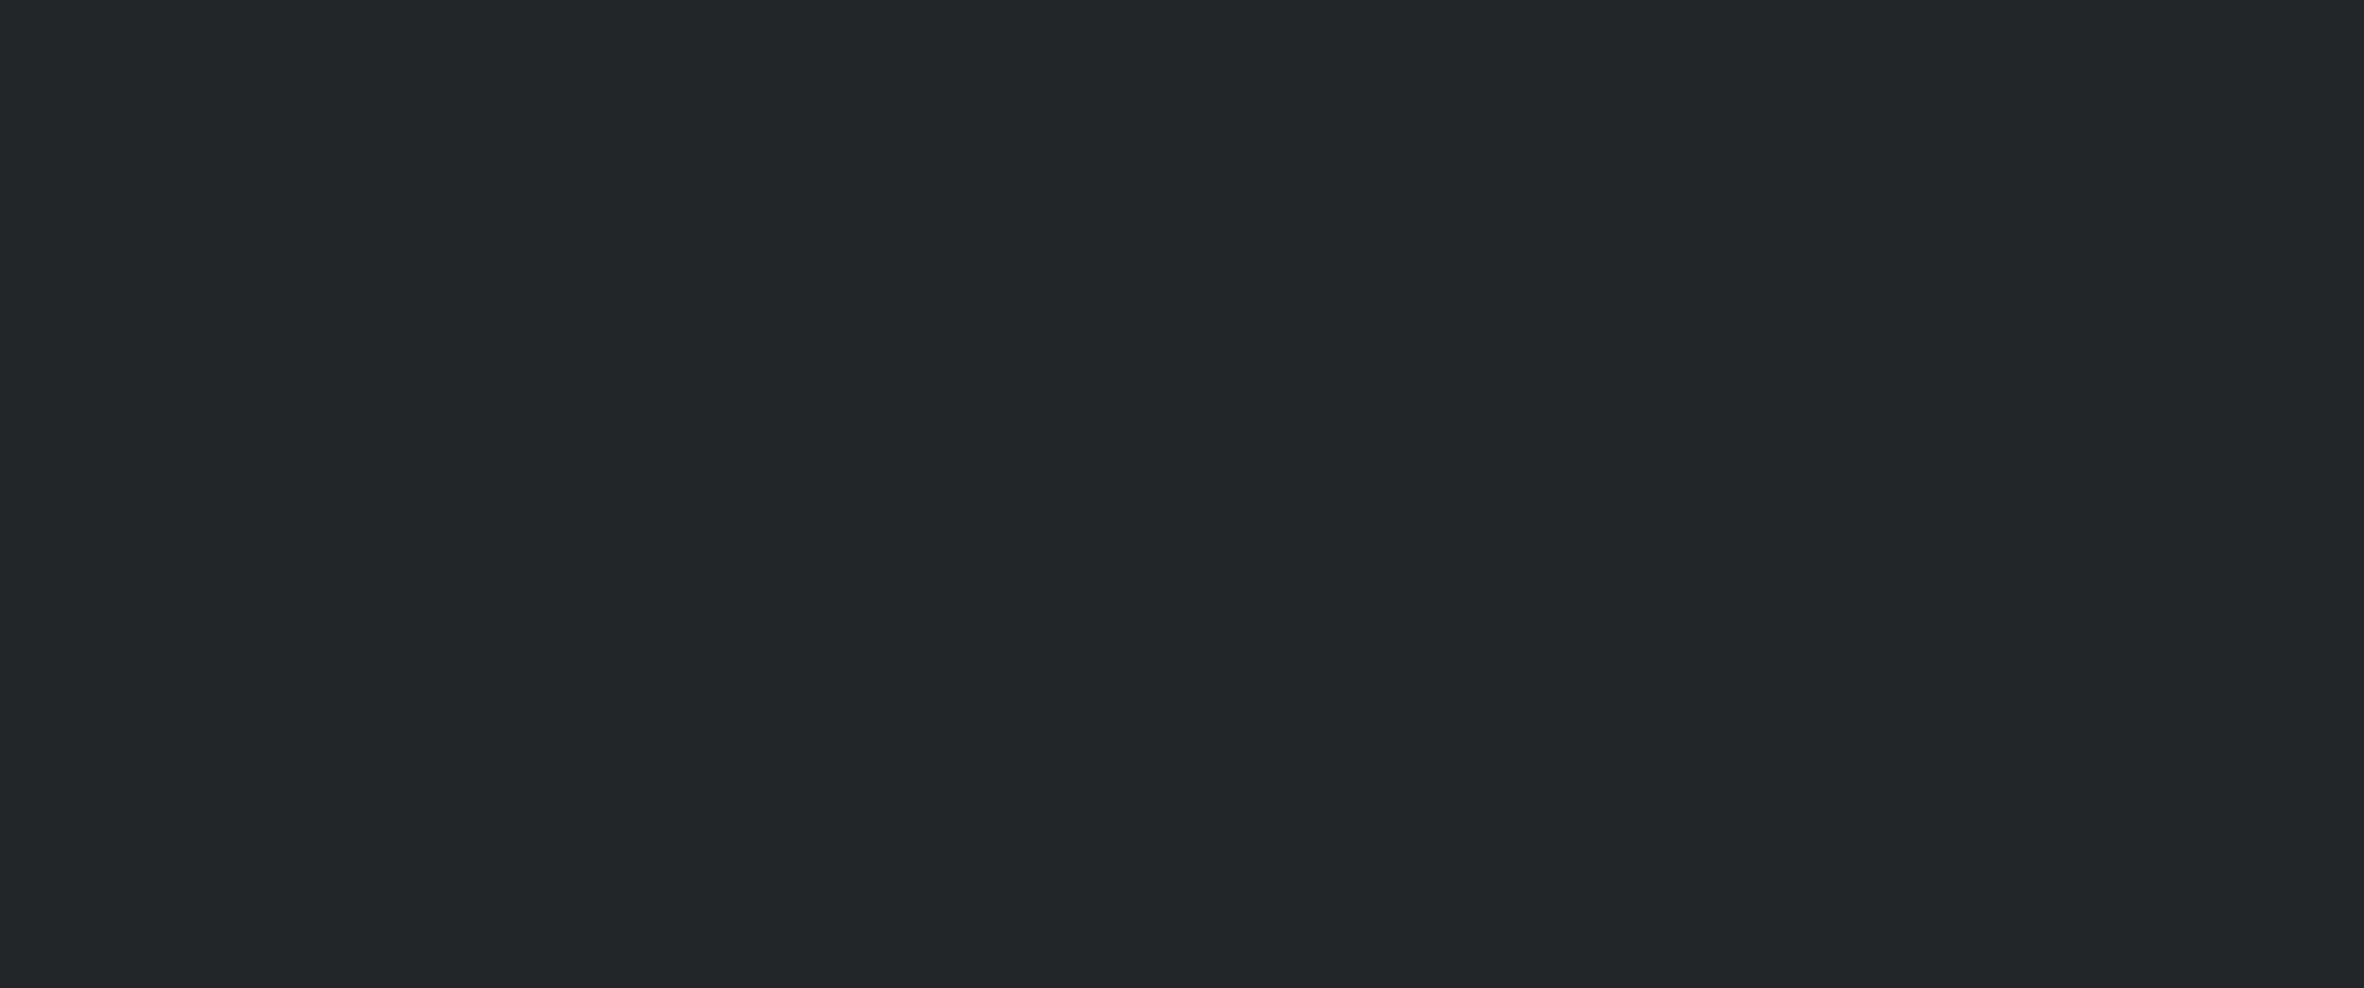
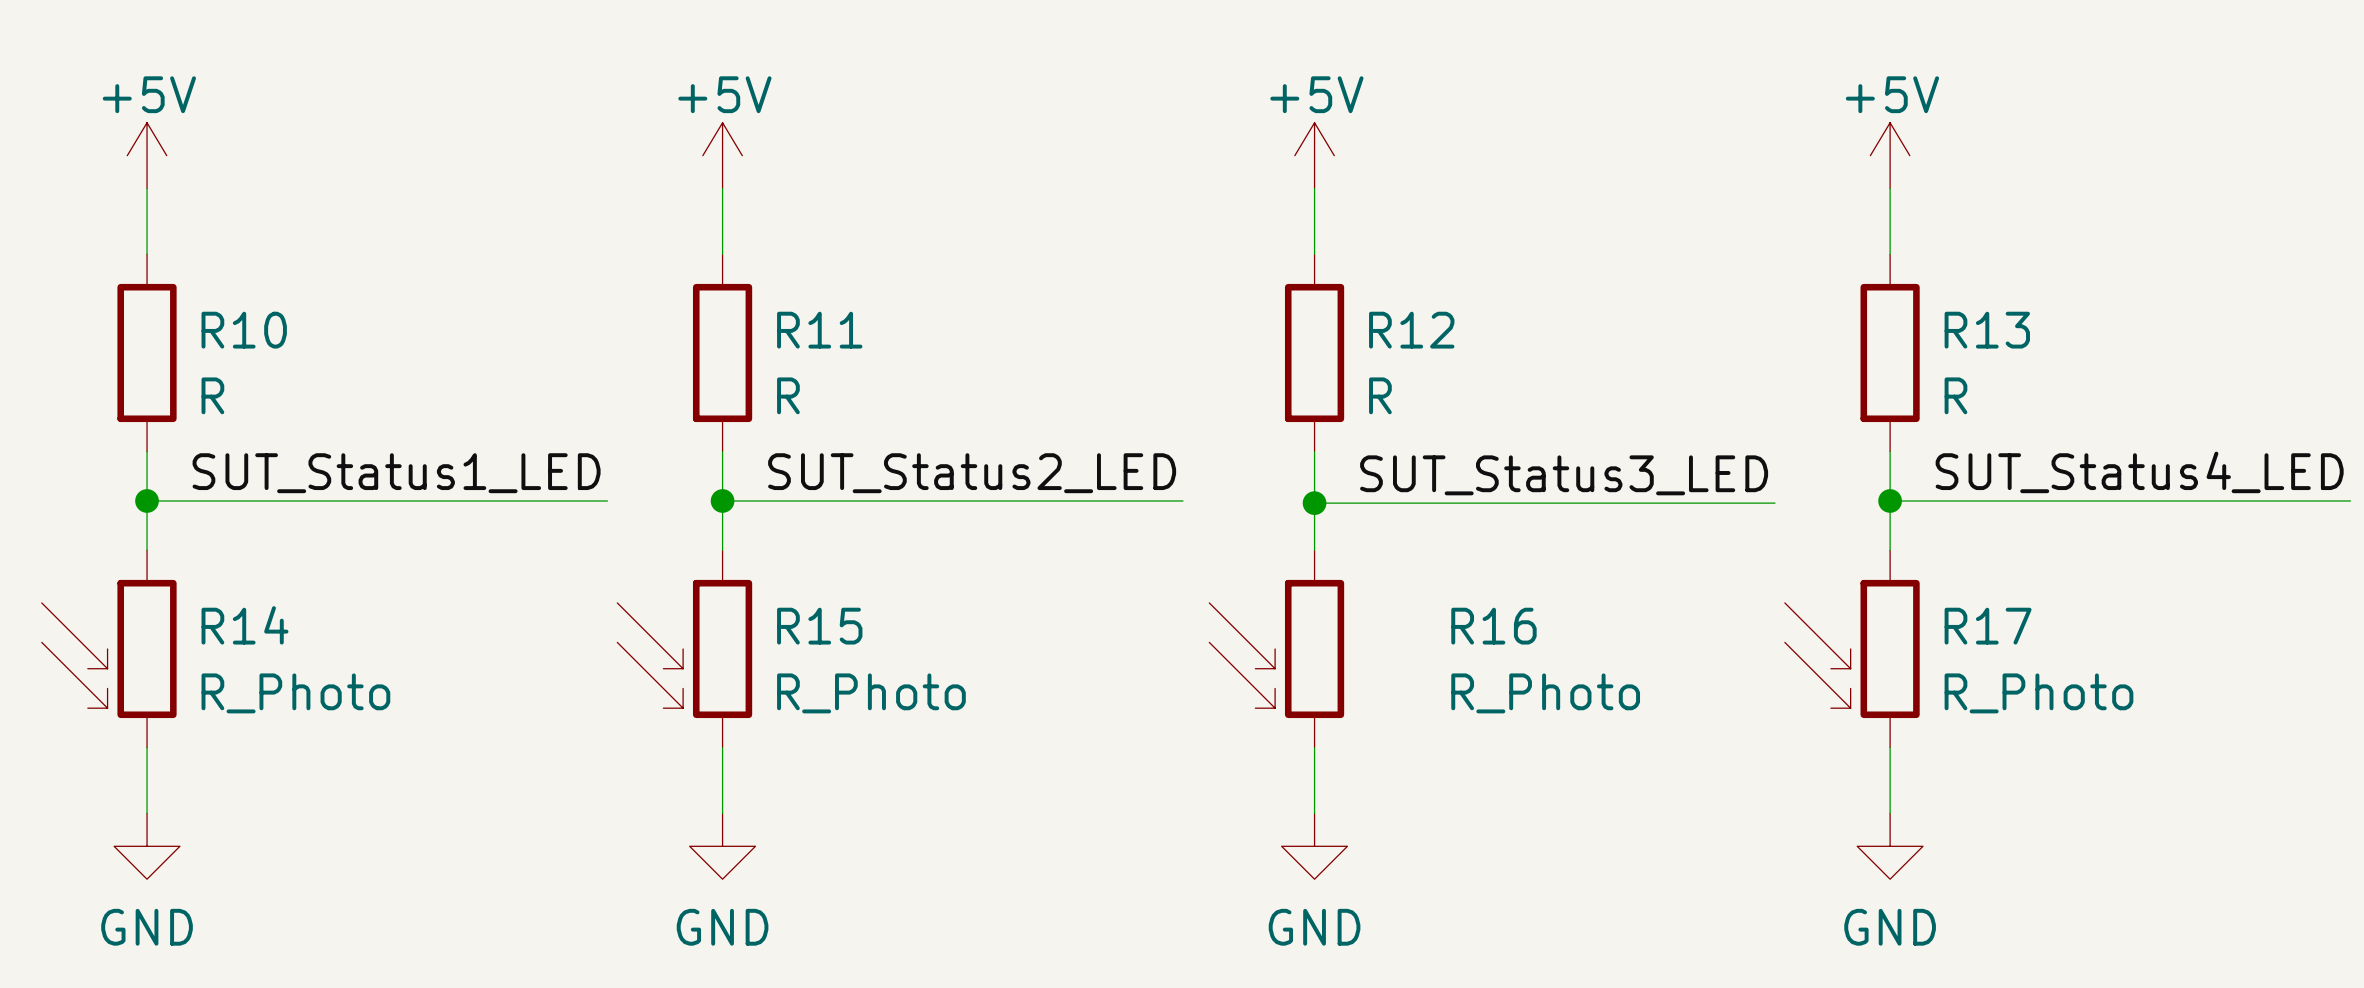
power symbol: none -> +5V (147, 155)
power symbol: none -> +5V (722, 155)
power symbol: none -> +5V (1314, 155)
power symbol: none -> +5V (1890, 155)
wire: none -> (147, 188) (147, 254)
wire: none -> (722, 188) (722, 254)
wire: none -> (1314, 188) (1314, 254)
wire: none -> (1890, 188) (1890, 254)
R10: none -> R (147, 352)
R11: none -> R (722, 352)
R12: none -> R (1314, 352)
R13: none -> R (1890, 352)
wire: none -> (147, 451) (147, 550)
wire: none -> (722, 451) (722, 550)
wire: none -> (1314, 451) (1314, 550)
wire: none -> (1890, 451) (1890, 550)
label: none -> SUT_Status1_LED (396, 473)
label: none -> SUT_Status2_LED (972, 473)
label: none -> SUT_Status4_LED (2139, 472)
label: none -> SUT_Status3_LED (1564, 475)
wire: none -> (147, 500) (607, 500)
junction: none -> (147, 500)
wire: none -> (722, 500) (1183, 500)
junction: none -> (722, 500)
wire: none -> (1890, 500) (2350, 500)
junction: none -> (1890, 500)
wire: none -> (1314, 503) (1774, 503)
junction: none -> (1314, 503)
R14: none -> R_Photo (109, 648)
R15: none -> R_Photo (684, 648)
R16: none -> R_Photo (1276, 648)
R17: none -> R_Photo (1852, 648)
wire: none -> (147, 747) (147, 813)
wire: none -> (722, 747) (722, 813)
wire: none -> (1314, 747) (1314, 813)
wire: none -> (1890, 747) (1890, 813)
power symbol: none -> GND (147, 846)
power symbol: none -> GND (722, 846)
power symbol: none -> GND (1314, 846)
power symbol: none -> GND (1890, 846)

